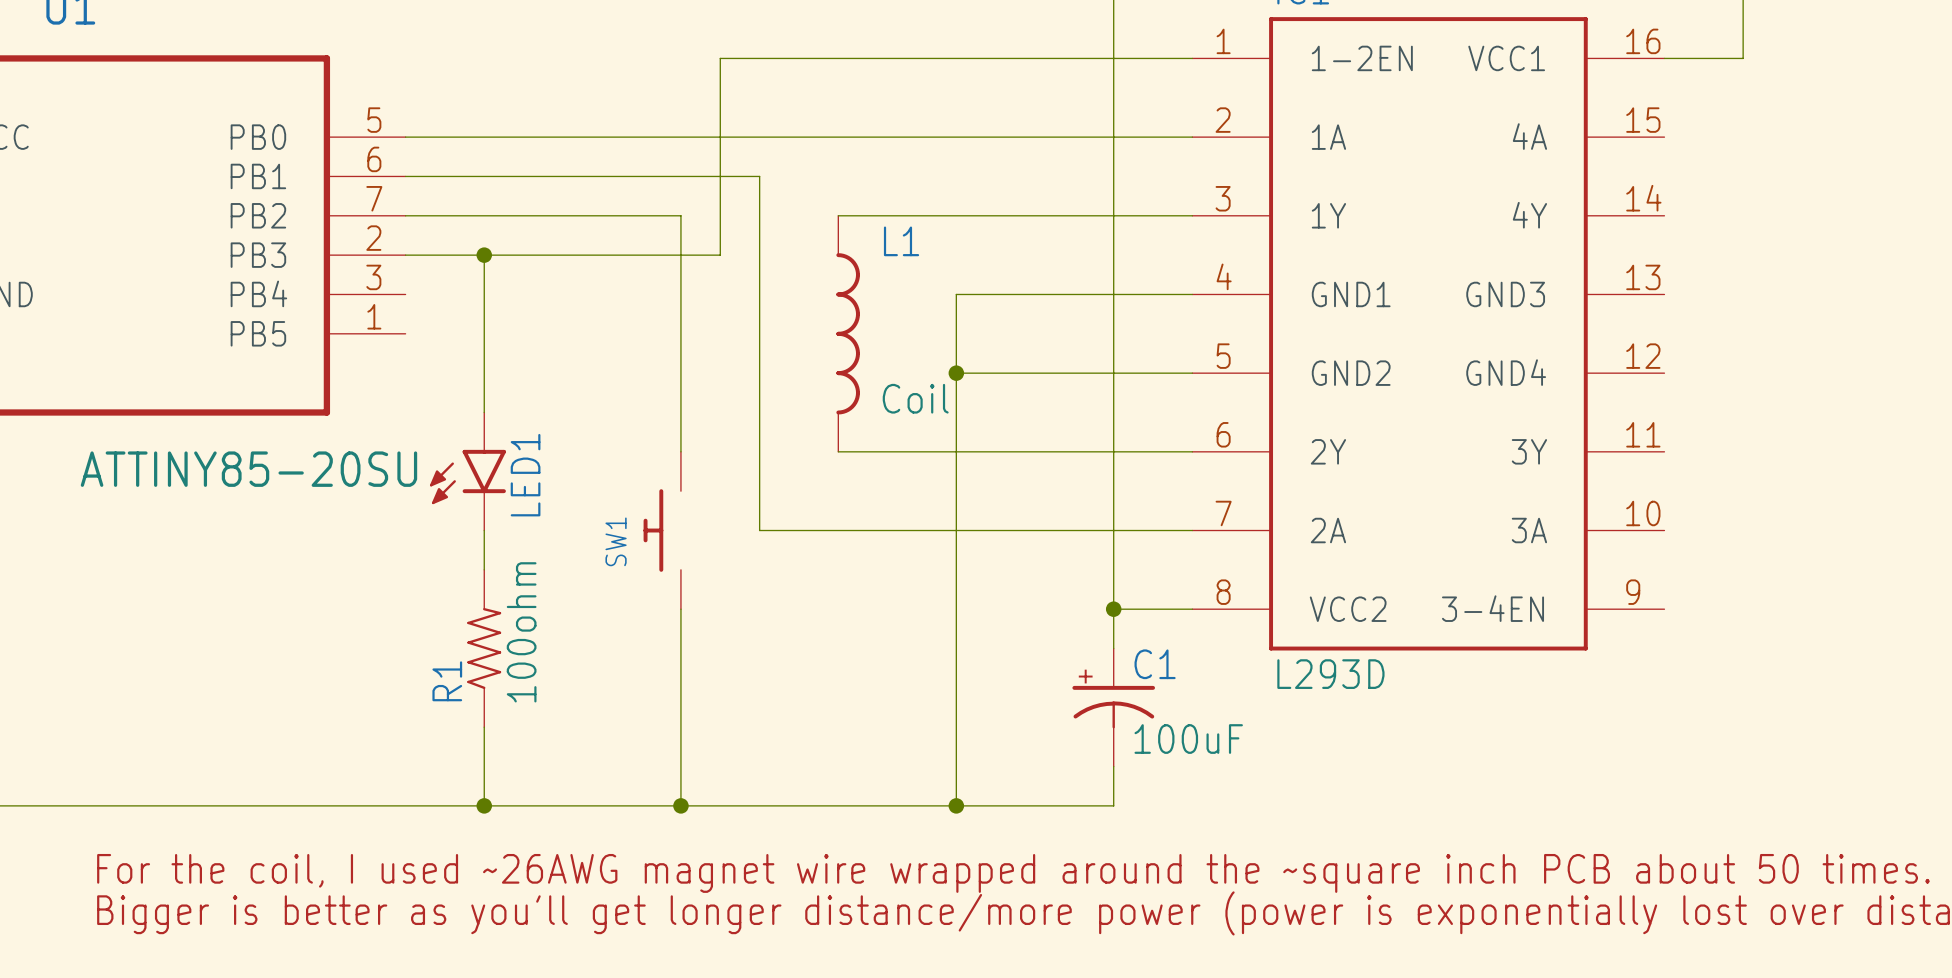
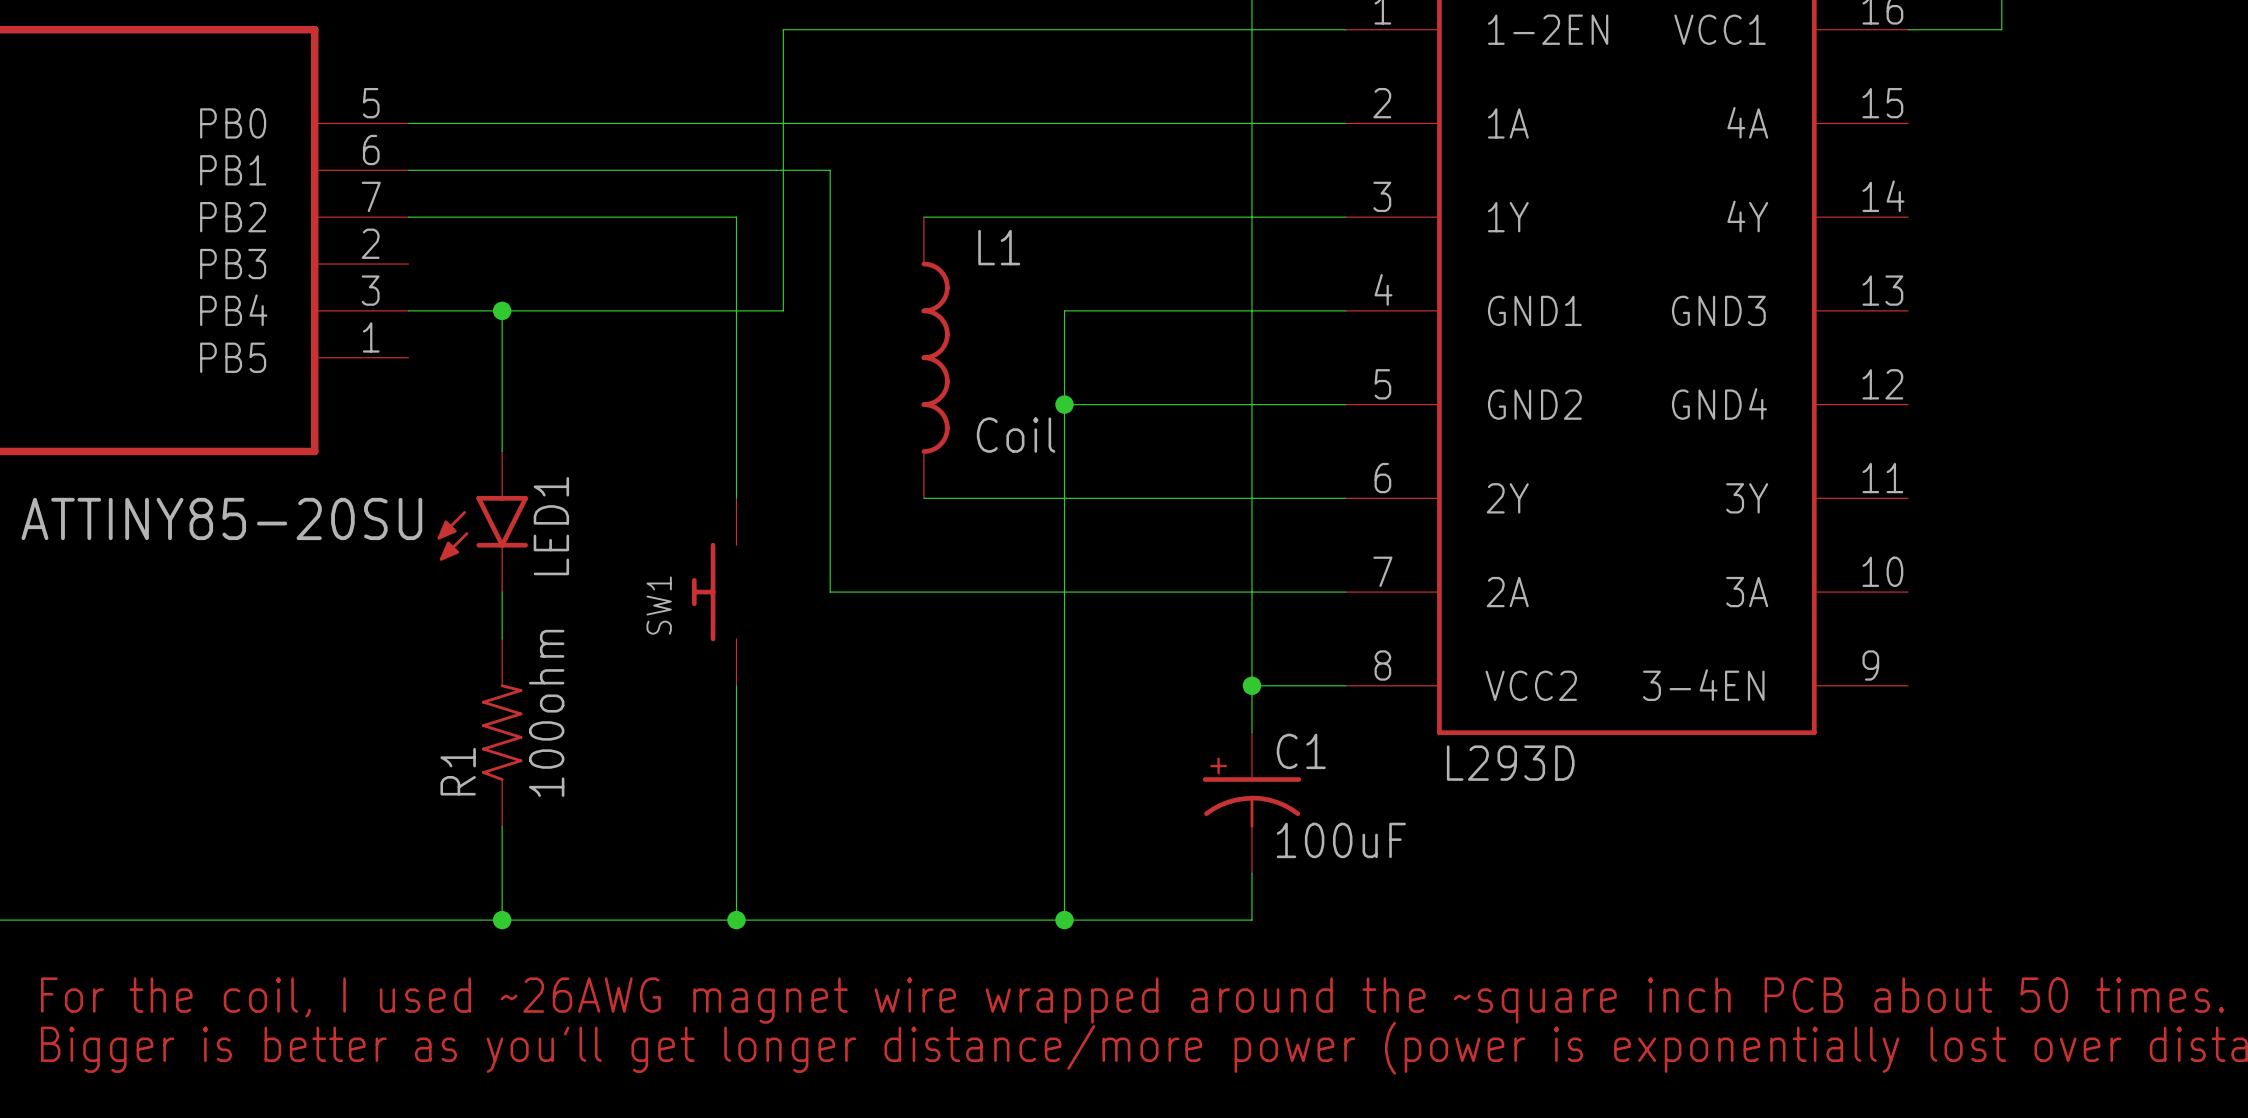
wire: (405, 255) (720, 255) -> (408, 310) (783, 310) (783, 264)
wire: (484, 255) (484, 294) -> none
junction position: (484, 255) -> (502, 310)

